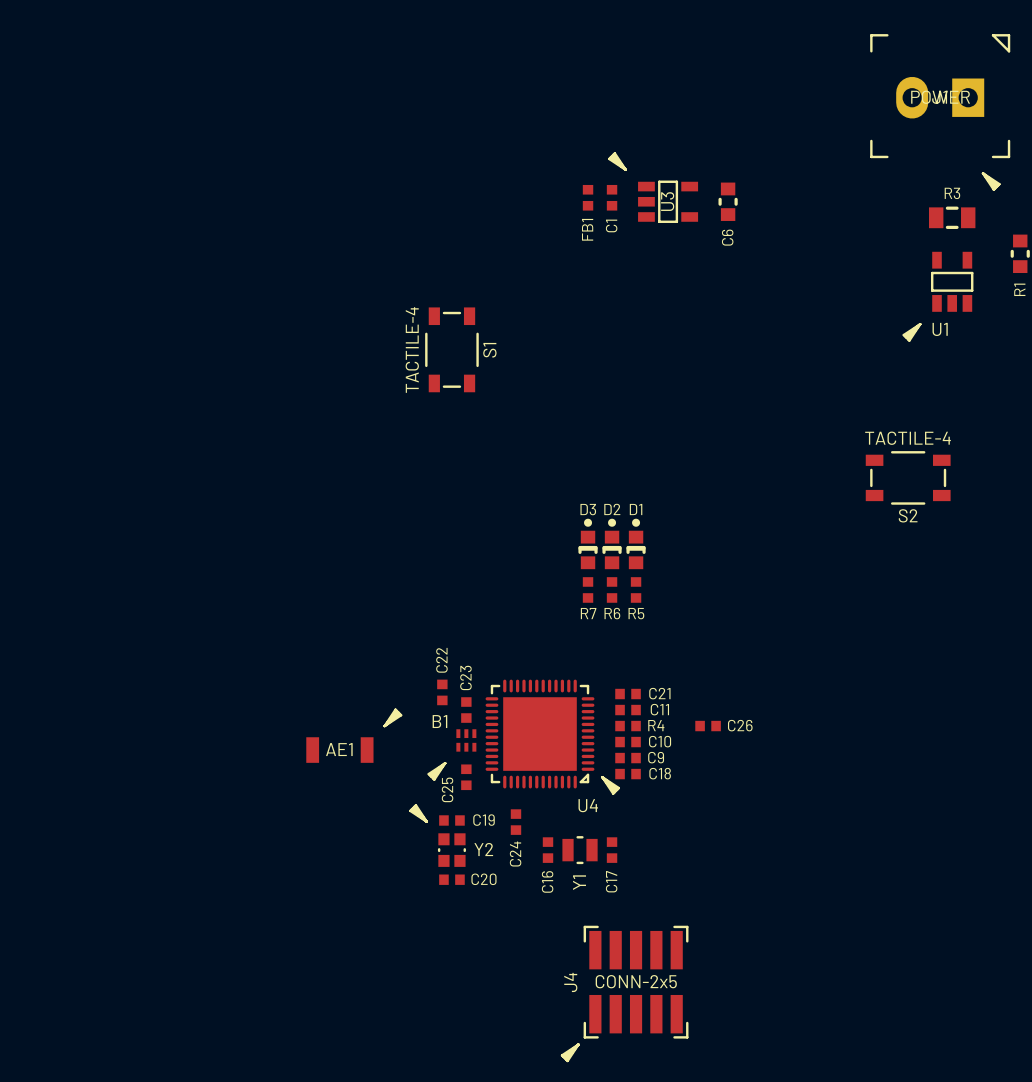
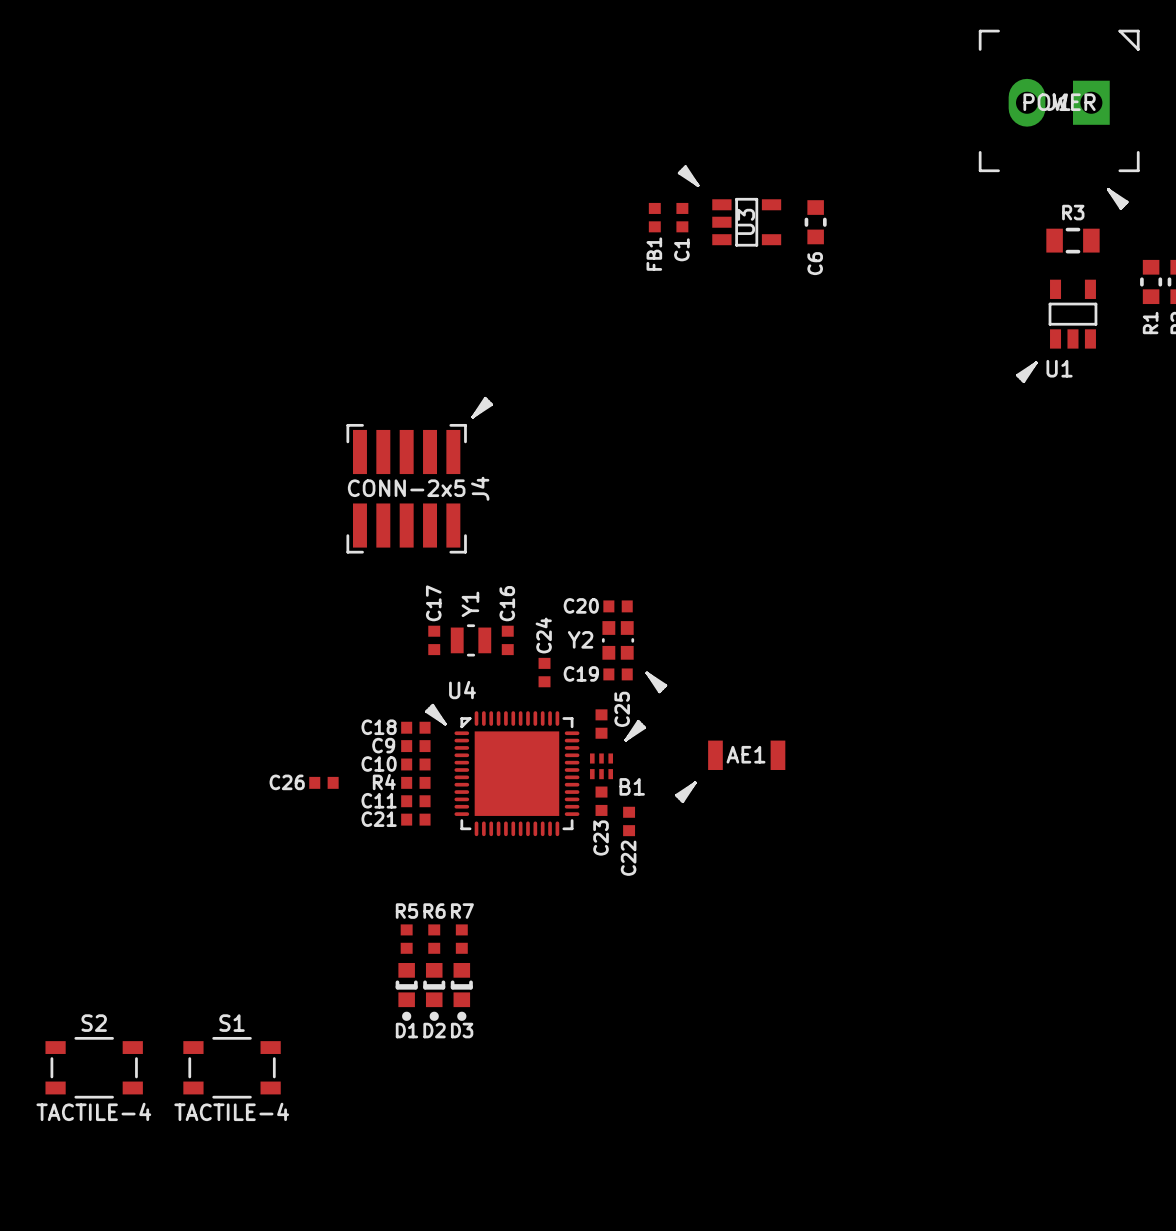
S1 rotation: 0° (451, 349) -> 90° clockwise (232, 1067)
S1 position: (451, 349) -> (232, 1067)
S1 value position: TACTILE-4 (412, 350) -> TACTILE-4 (231, 1111)
S1 name position: S1 (489, 350) -> S1 (232, 1023)
S2 value position: TACTILE-4 (908, 438) -> TACTILE-4 (93, 1111)
S2 position: (908, 477) -> (94, 1067)
S2 name position: S2 (908, 515) -> S2 (94, 1023)
D3 rotation: 0° (588, 543) -> 180° (461, 991)
D3 position: (588, 543) -> (461, 991)
D2 rotation: 0° (612, 543) -> 180° (434, 991)
D2 position: (612, 543) -> (434, 991)
D1 rotation: 0° (636, 543) -> 180° (406, 991)
D1 position: (636, 543) -> (406, 991)
R7 position: (588, 589) -> (461, 939)
R6 position: (612, 589) -> (434, 939)
R5 position: (636, 589) -> (406, 939)
R7 name position: R7 (588, 613) -> R7 (462, 911)
R6 name position: R6 (612, 613) -> R6 (434, 911)
R5 name position: R5 (636, 613) -> R5 (406, 911)
C22 name position: C22 (441, 660) -> C22 (628, 858)
C23 name position: C23 (465, 677) -> C23 (601, 838)
C22 position: (442, 692) -> (629, 821)
C21 name position: C21 (659, 693) -> C21 (379, 819)
C21 position: (628, 694) -> (415, 819)
C11 name position: C11 (659, 709) -> C11 (379, 800)
C23 position: (466, 710) -> (601, 801)
C11 position: (628, 710) -> (415, 801)
R4 name position: R4 (656, 725) -> R4 (384, 782)
C26 name position: C26 (740, 725) -> C26 (287, 782)
R4 position: (628, 726) -> (415, 782)
C26 position: (708, 726) -> (323, 782)
AE1 rotation: 0° (354, 735) -> 180° (730, 771)
AE1 position: (354, 735) -> (730, 771)
U4 rotation: 0° (552, 737) -> 180° (502, 769)
U4 position: (552, 737) -> (502, 769)
C10 name position: C10 (660, 741) -> C10 (379, 764)
C10 position: (628, 742) -> (415, 764)
B1 rotation: 0° (451, 755) -> 180° (618, 749)
B1 position: (451, 755) -> (618, 749)
C9 name position: C9 (656, 757) -> C9 (383, 745)
C9 position: (628, 758) -> (415, 746)
C18 name position: C18 (660, 773) -> C18 (379, 727)
C18 position: (628, 774) -> (415, 727)
C25 position: (466, 777) -> (601, 724)
C25 name position: C25 (447, 789) -> C25 (622, 709)
C19 position: (451, 820) -> (618, 674)
C19 name position: C19 (484, 820) -> C19 (581, 673)
C24 position: (515, 822) -> (544, 672)
Y2 rotation: 0° (437, 835) -> 180° (634, 657)
Y2 position: (437, 835) -> (634, 657)
C16 position: (548, 850) -> (507, 640)
Y1 position: (580, 850) -> (471, 640)
C17 position: (612, 850) -> (434, 640)
C24 name position: C24 (515, 854) -> C24 (543, 635)
C20 position: (451, 879) -> (618, 606)
C20 name position: C20 (483, 879) -> C20 (581, 605)
C16 name position: C16 (547, 881) -> C16 (507, 603)
C17 name position: C17 (611, 881) -> C17 (433, 603)
Y1 name position: Y1 (579, 882) -> Y1 (470, 604)
J4 rotation: 0° (624, 993) -> 180° (419, 475)
J4 position: (624, 993) -> (419, 475)

